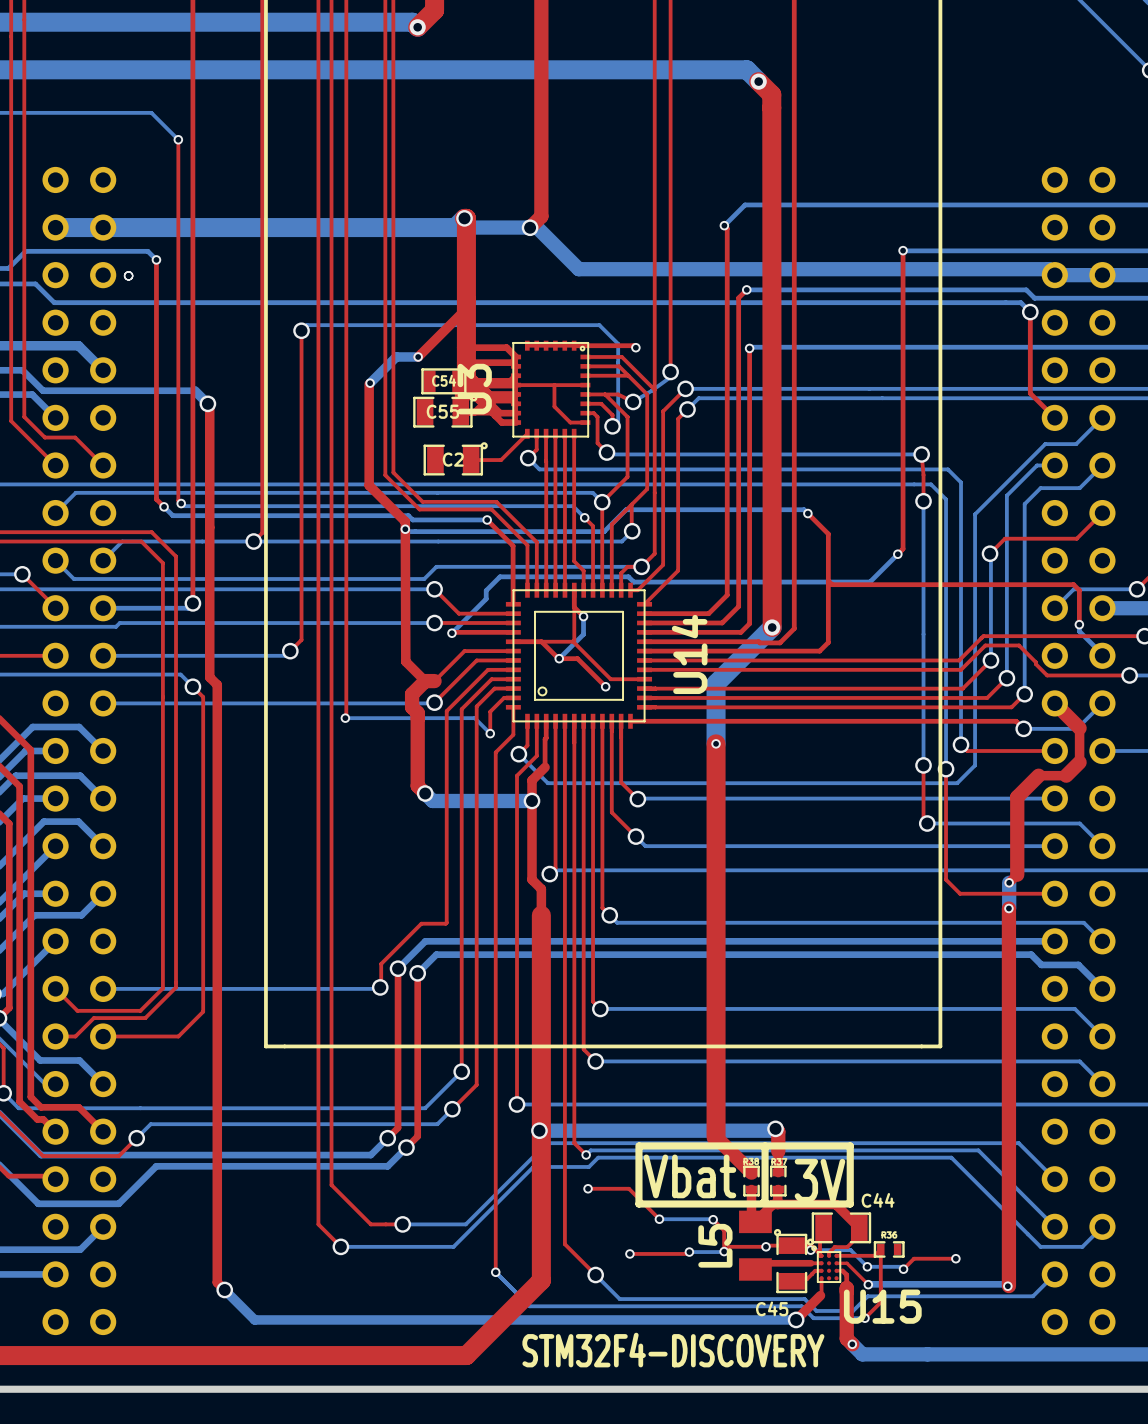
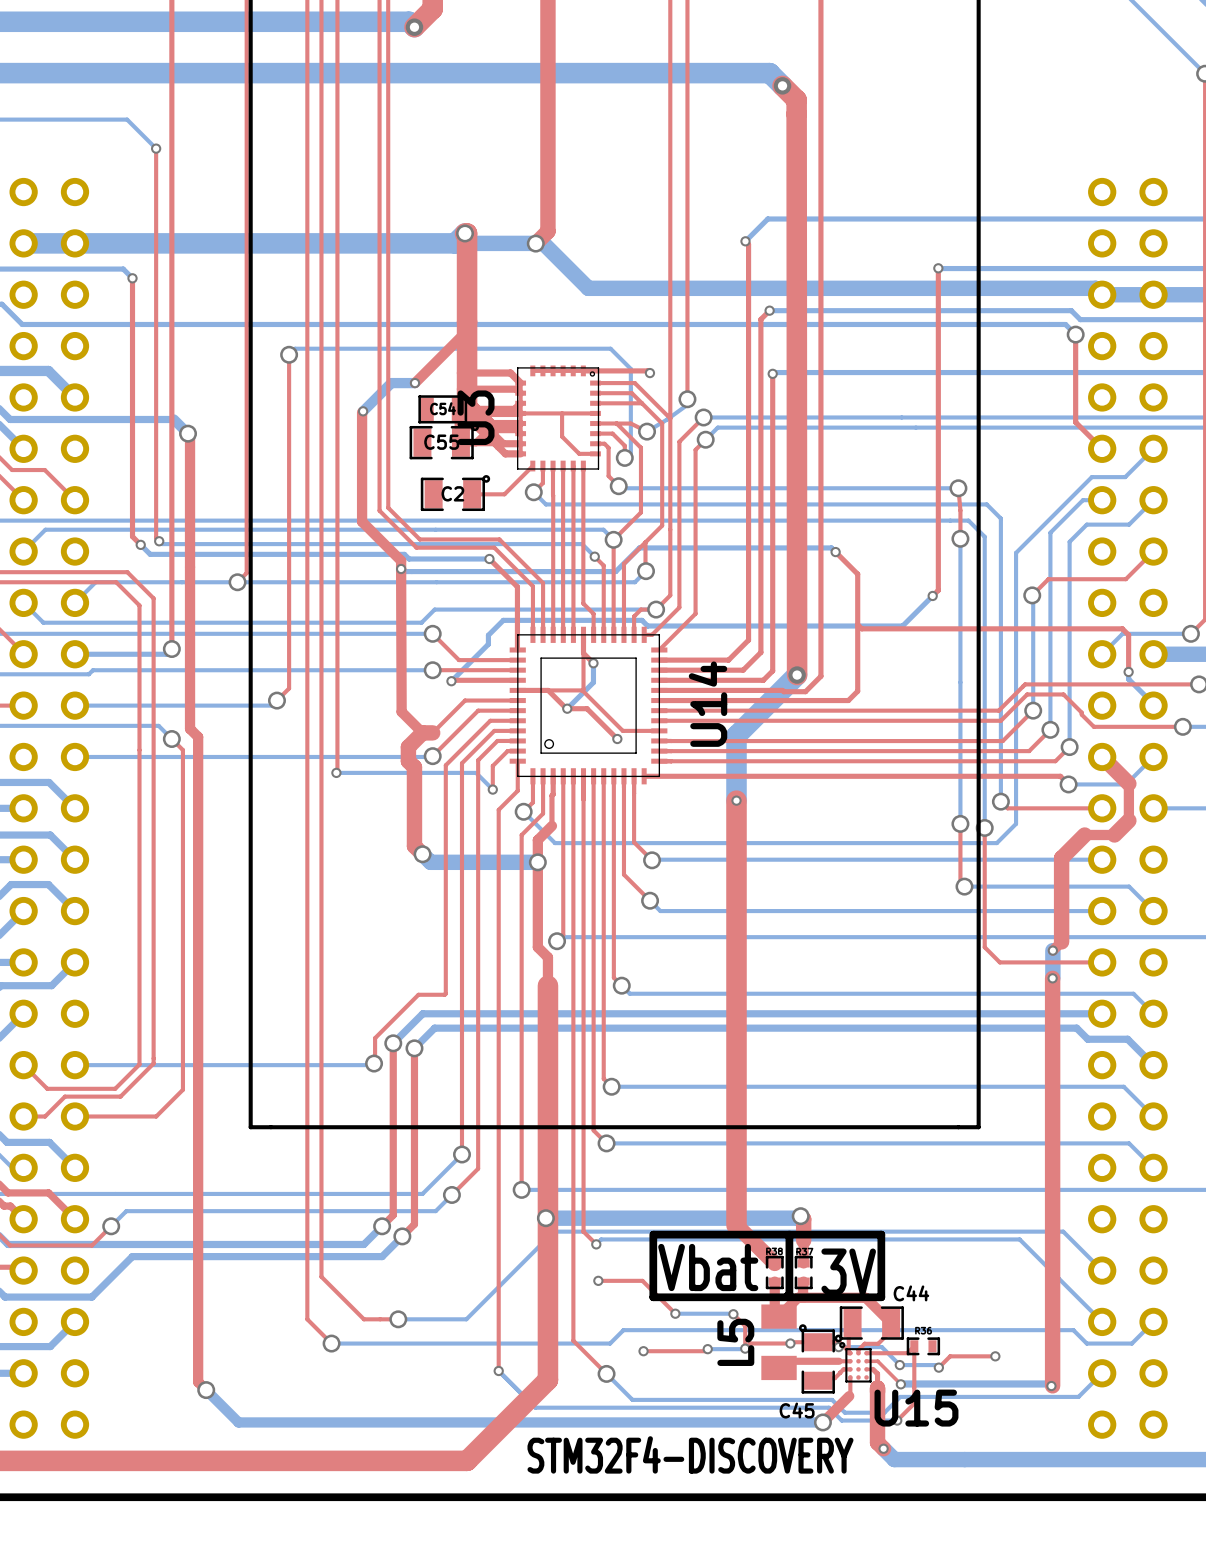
via: (128, 275) -> none
bottom track: (1028, 1234) (951, 1157) (598, 1157) (588, 1166) (533, 1166) (453, 1246) -> (1073, 1330) (623, 1330) (610, 1343) (453, 1343)

